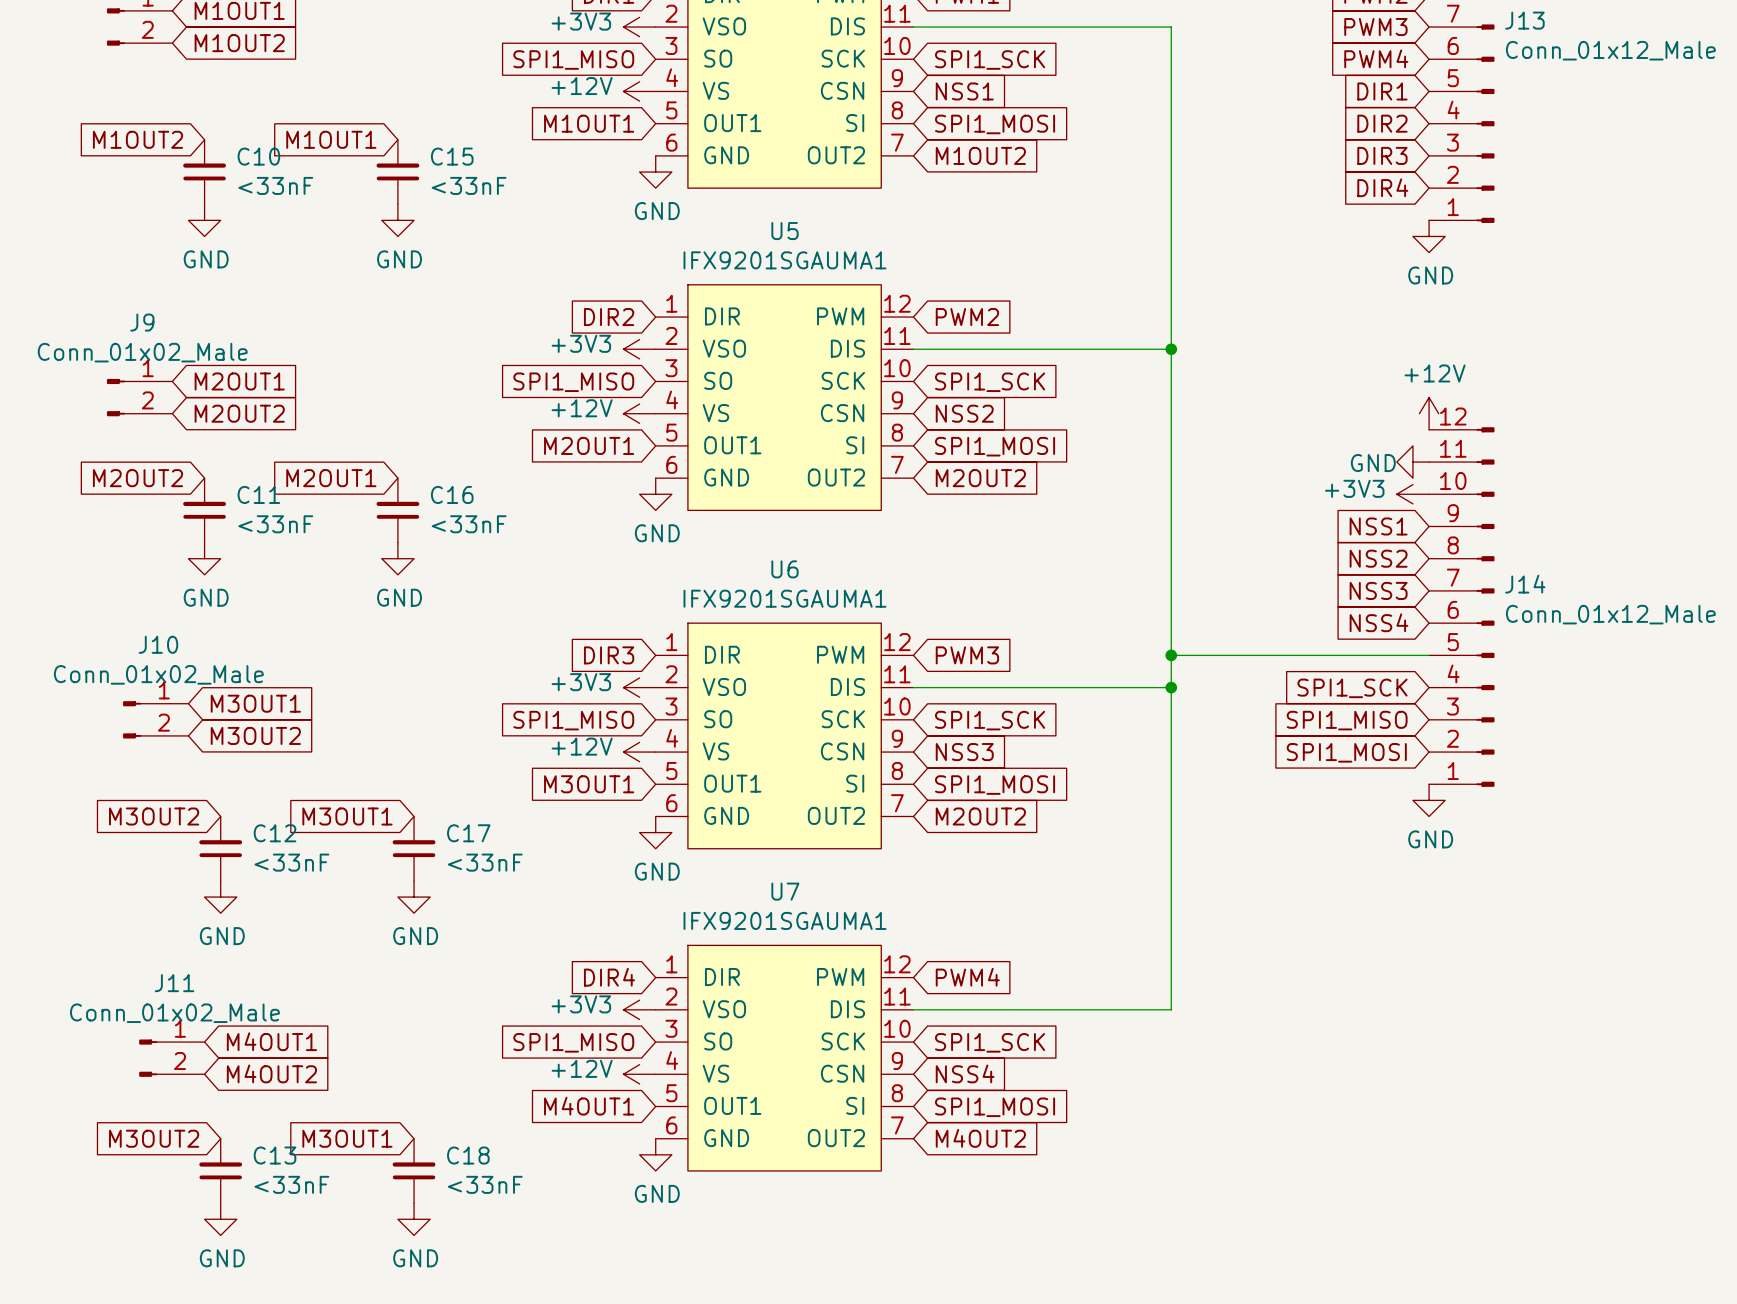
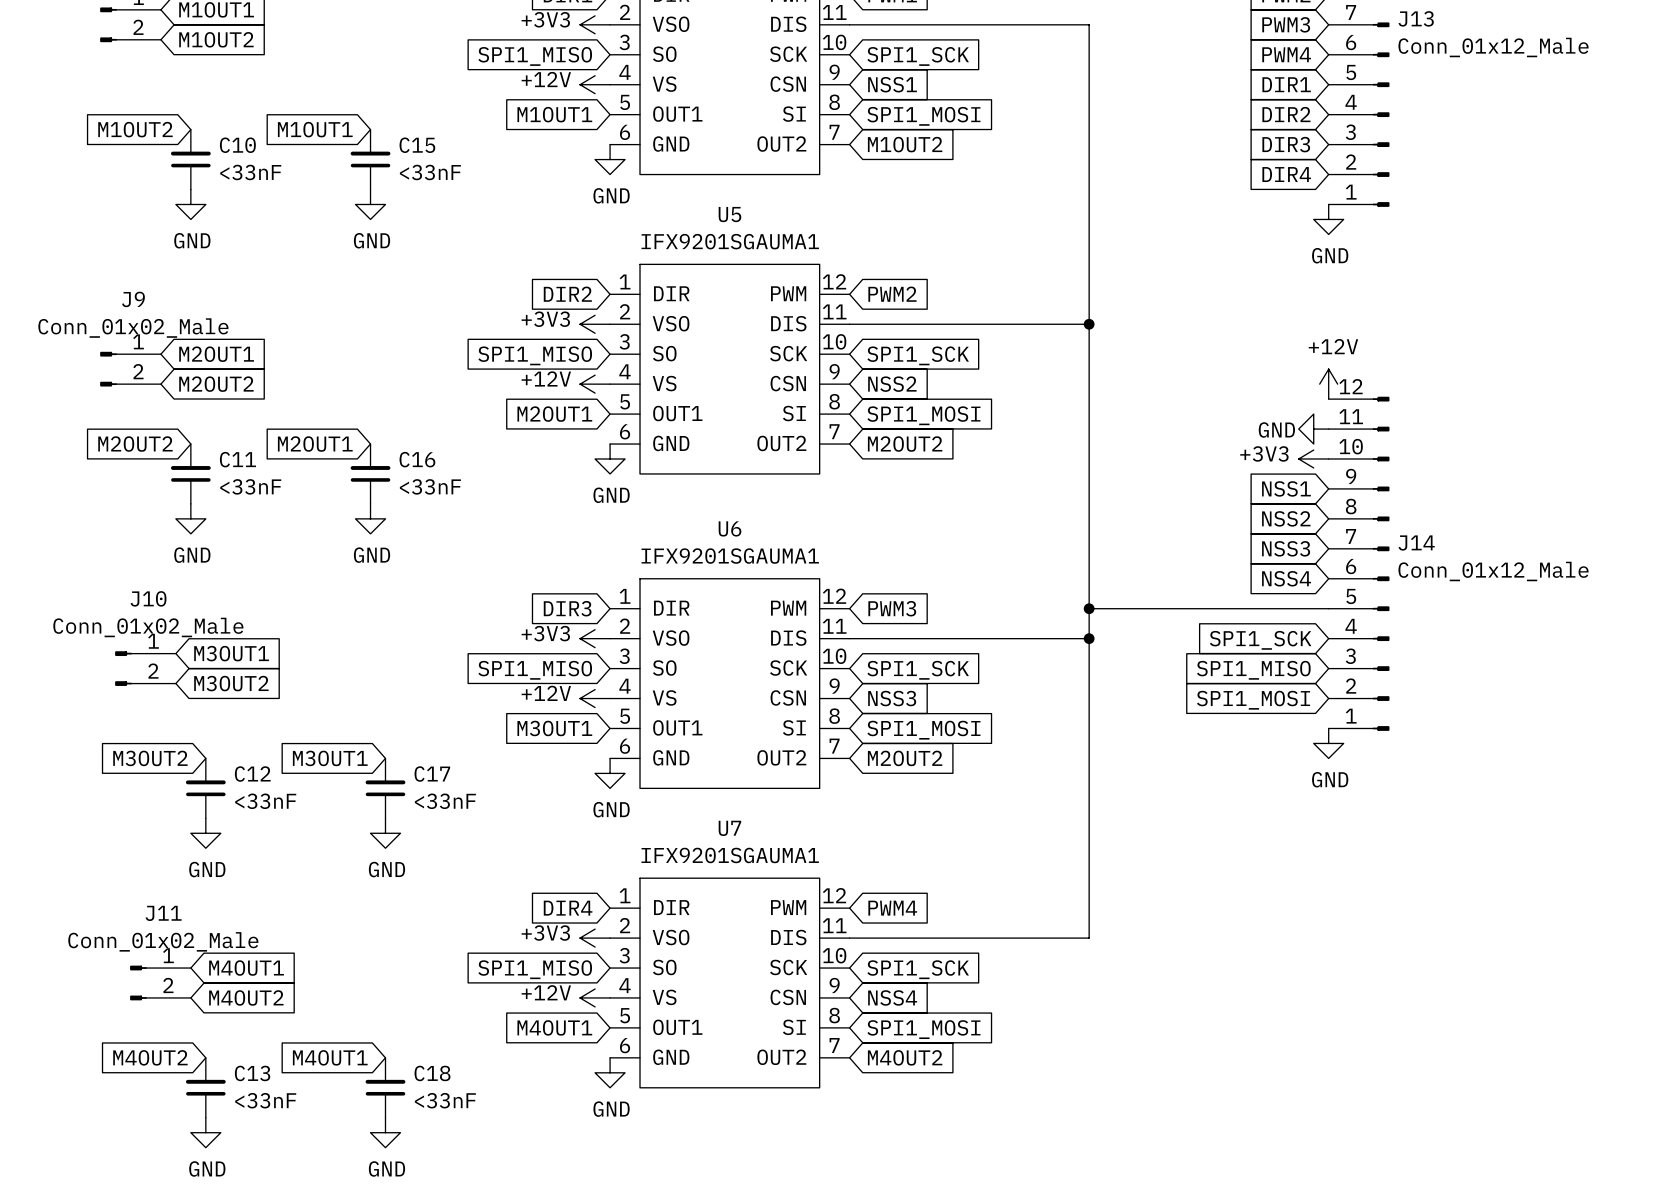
global label: M3OUT2 (154, 1138) -> M4OUT2 (150, 1057)
global label: M3OUT1 (347, 1138) -> M4OUT1 (330, 1057)

